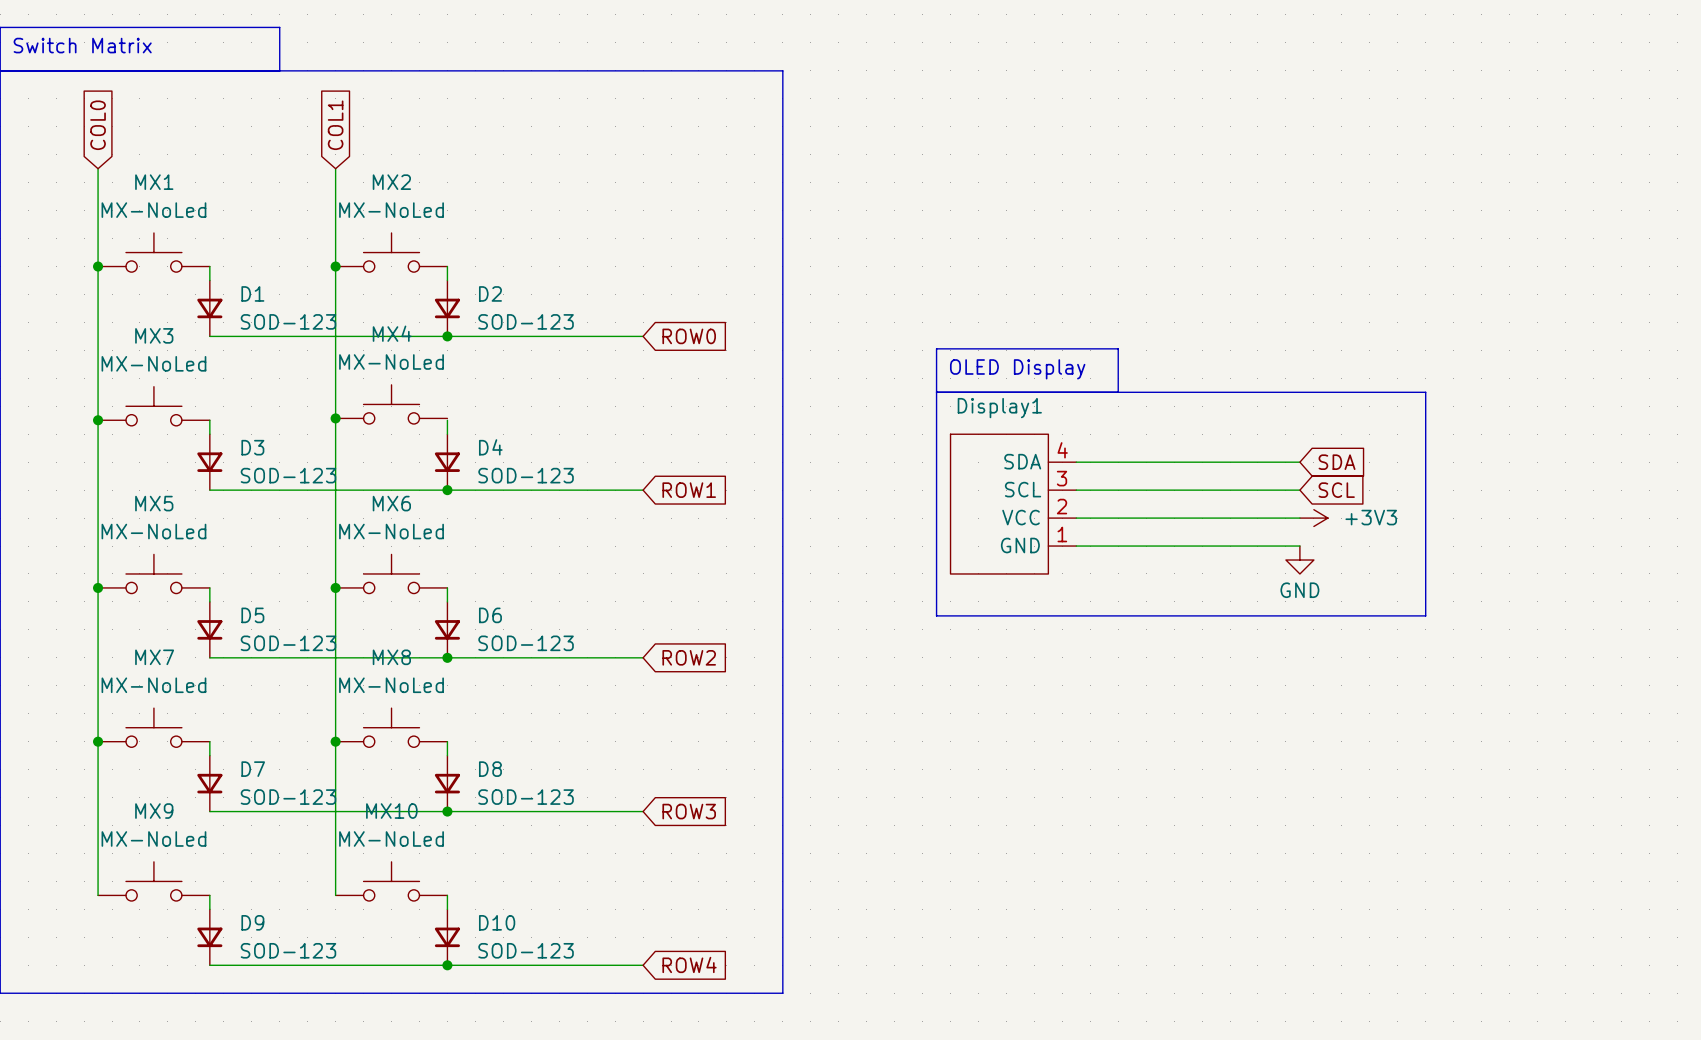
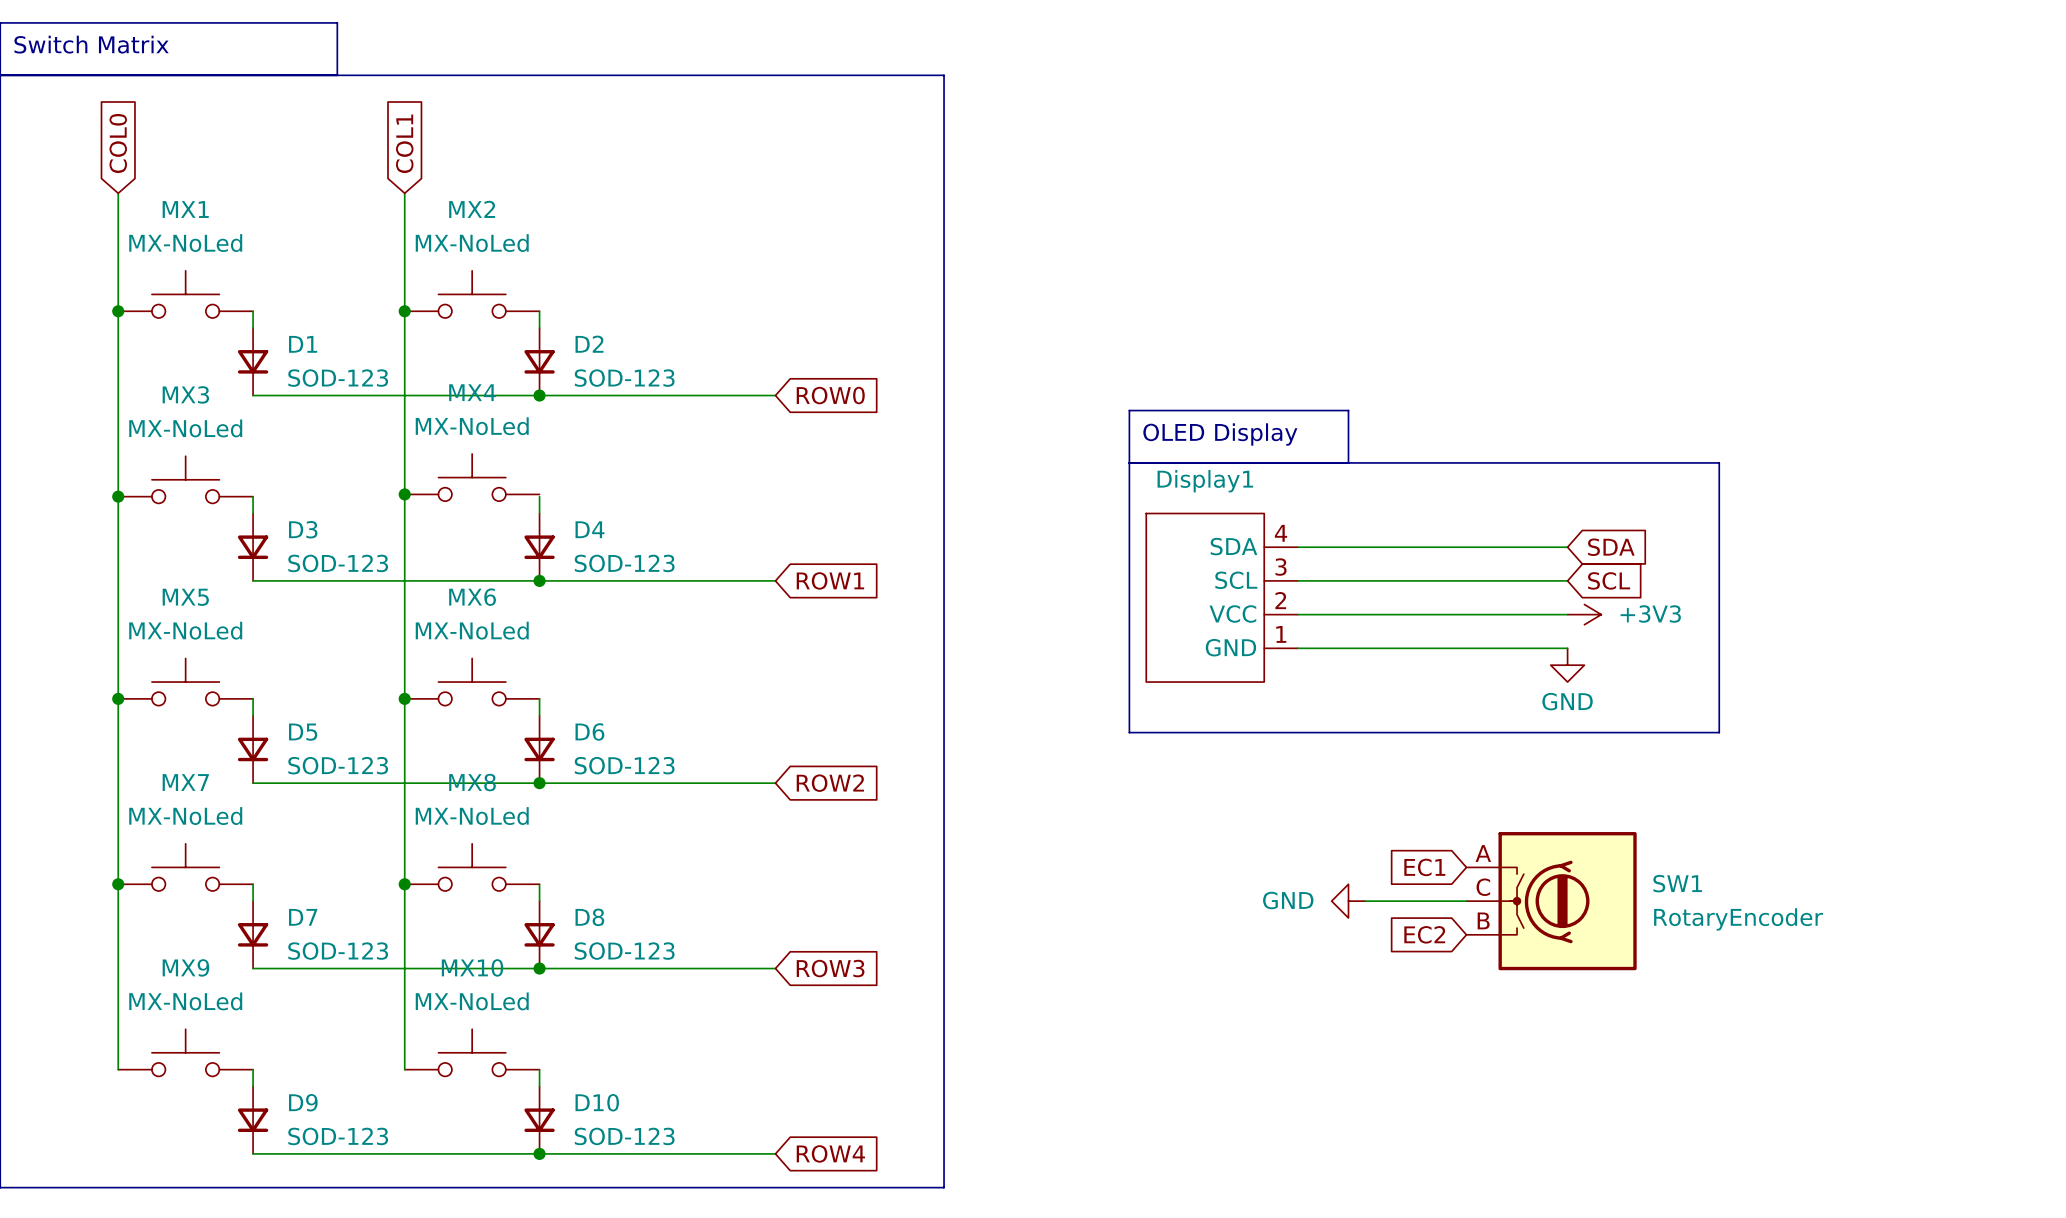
global label: none -> EC1 (1424, 867)
power symbol: none -> GND (1348, 901)
wire: none -> (1365, 901) (1466, 901)
SW1: none -> RotaryEncoder (1551, 901)
global label: none -> EC2 (1424, 934)

